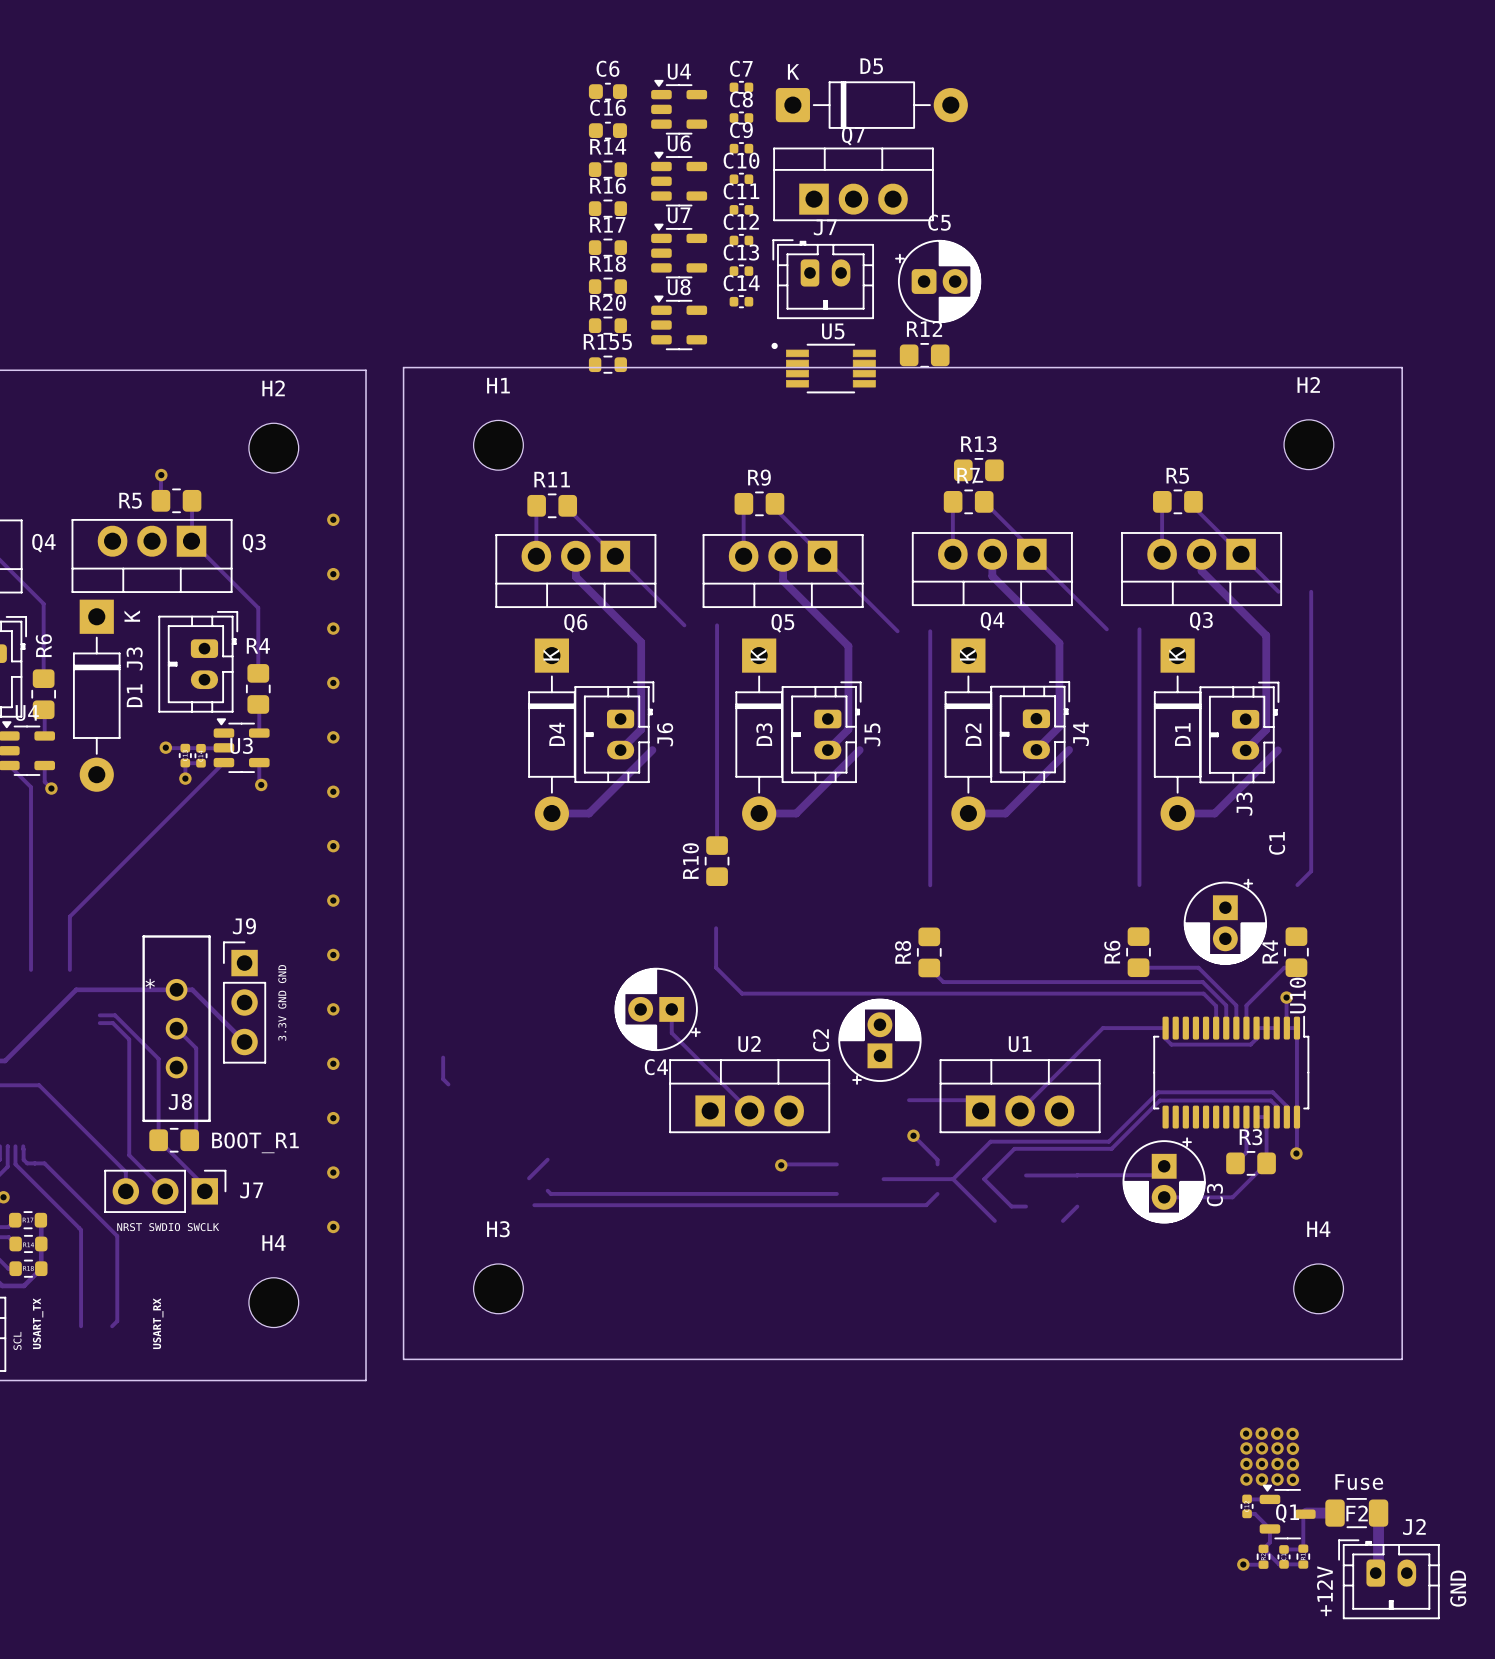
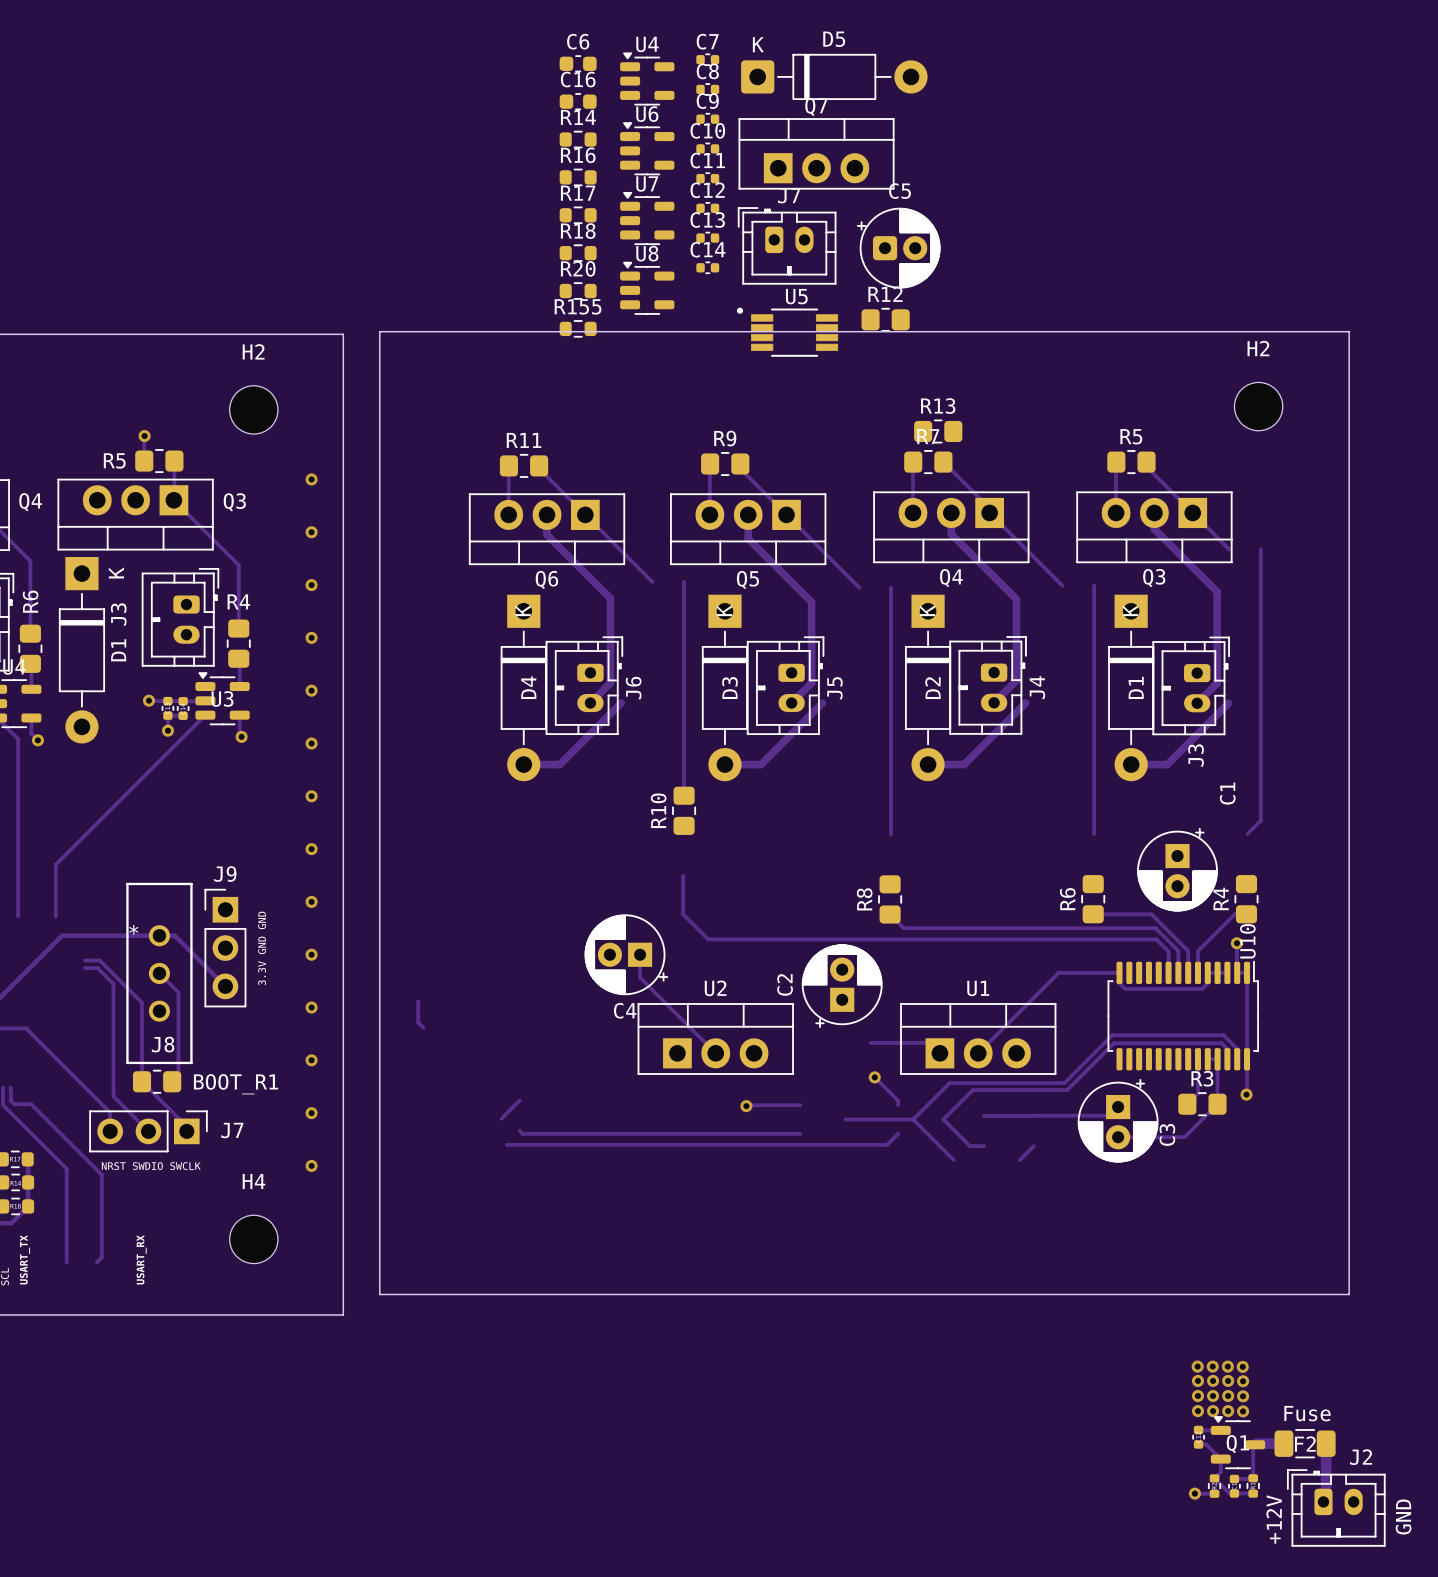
H1: (498, 445) -> none
H3: (498, 1288) -> none
H4: (1318, 1288) -> none

